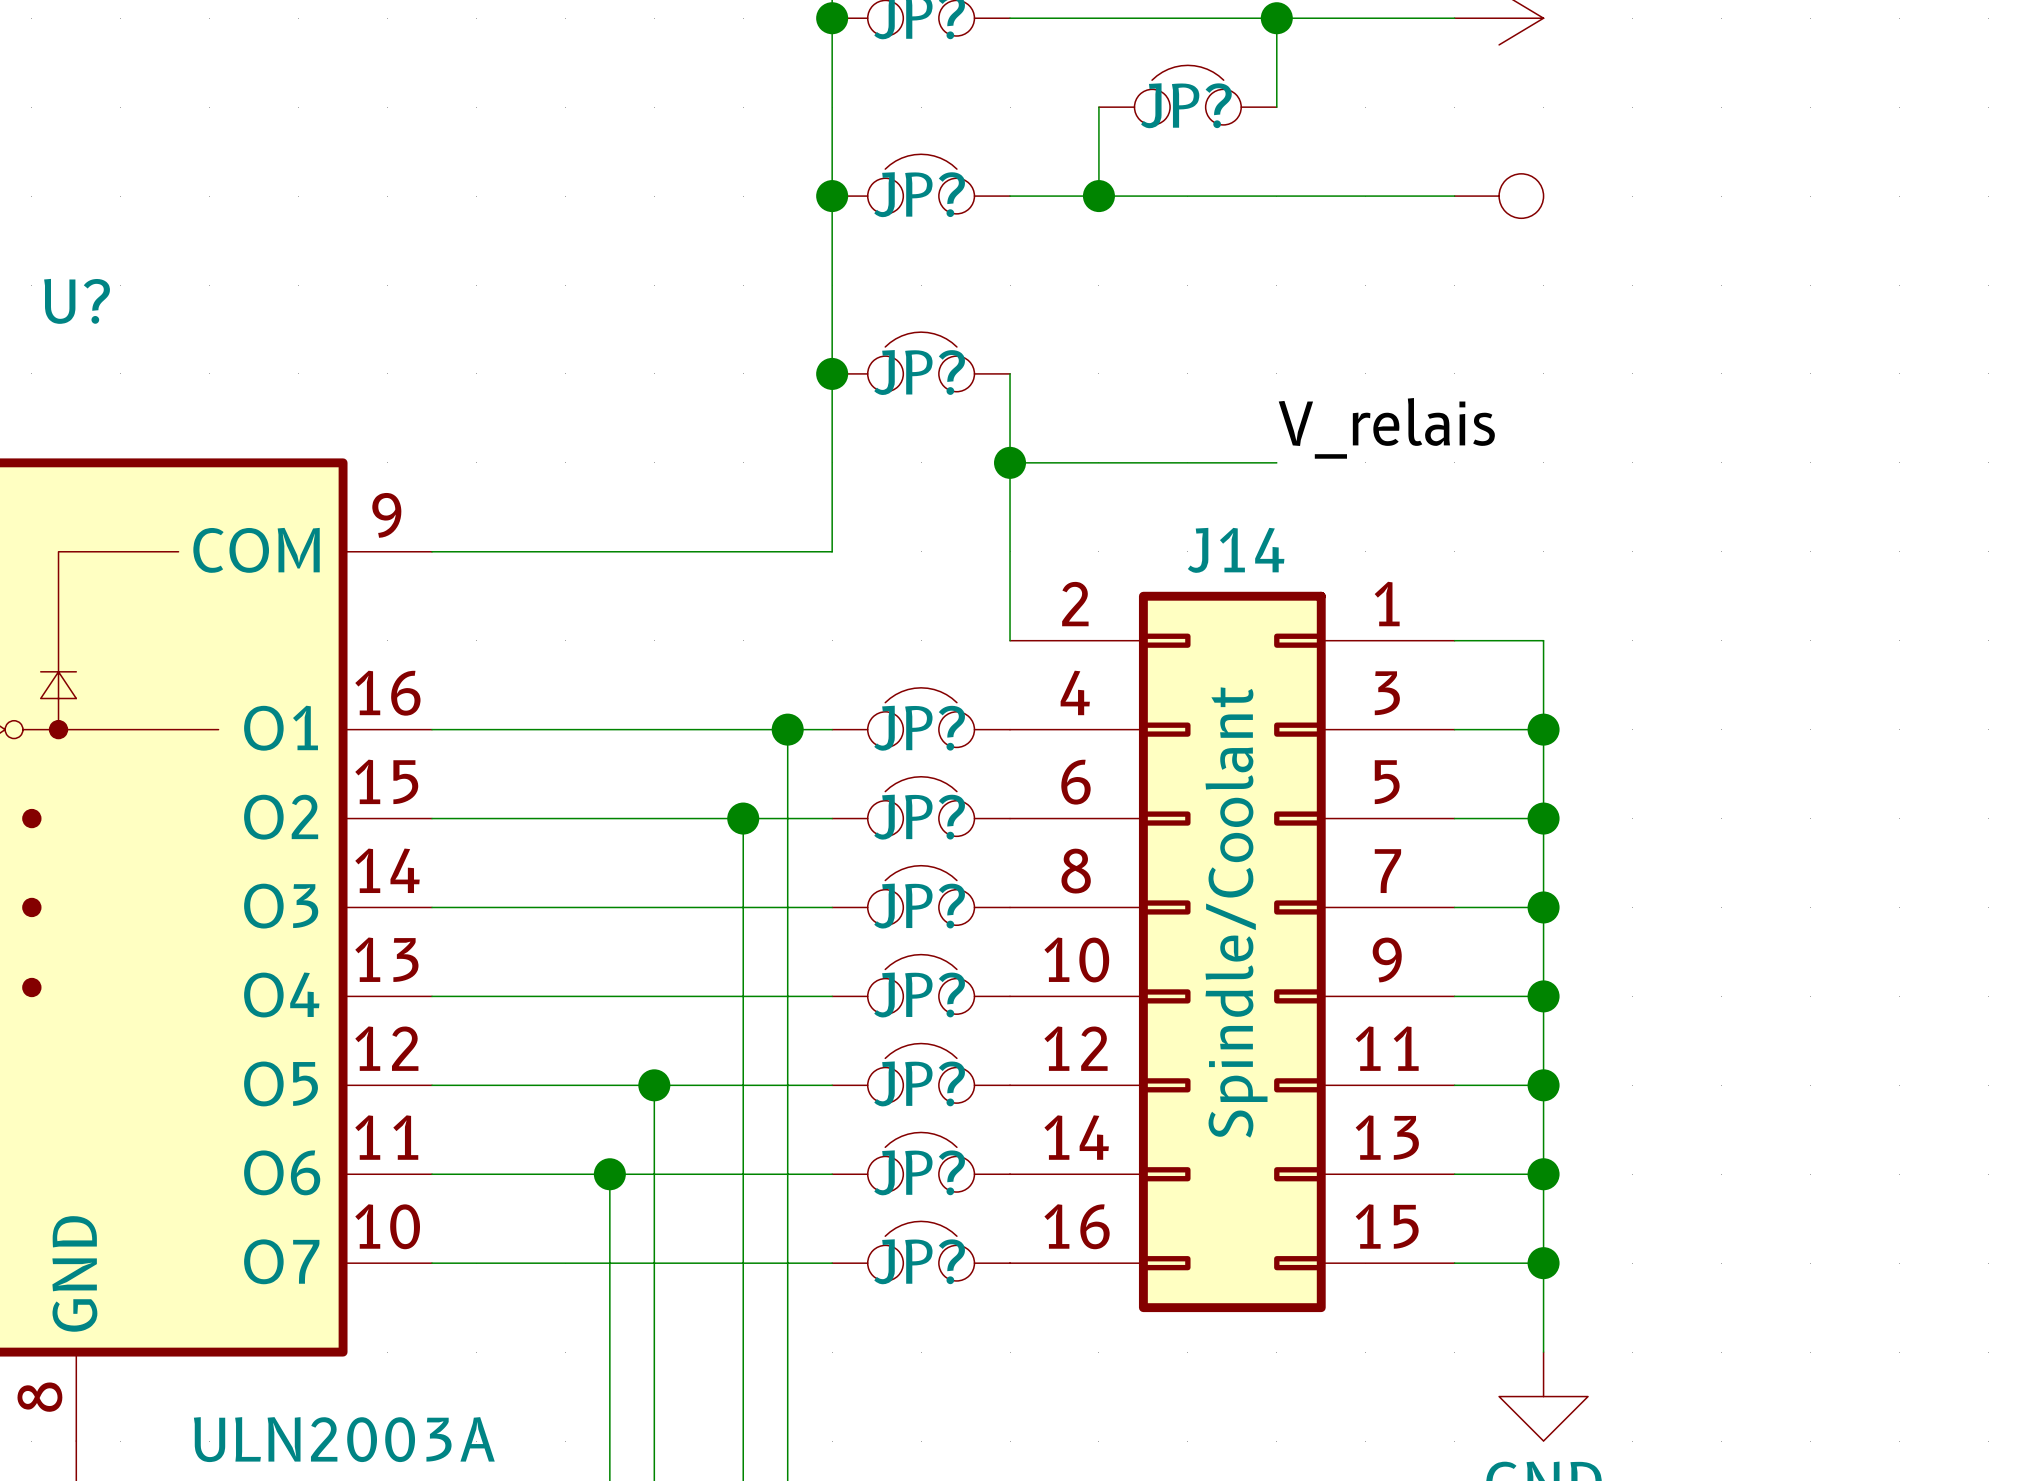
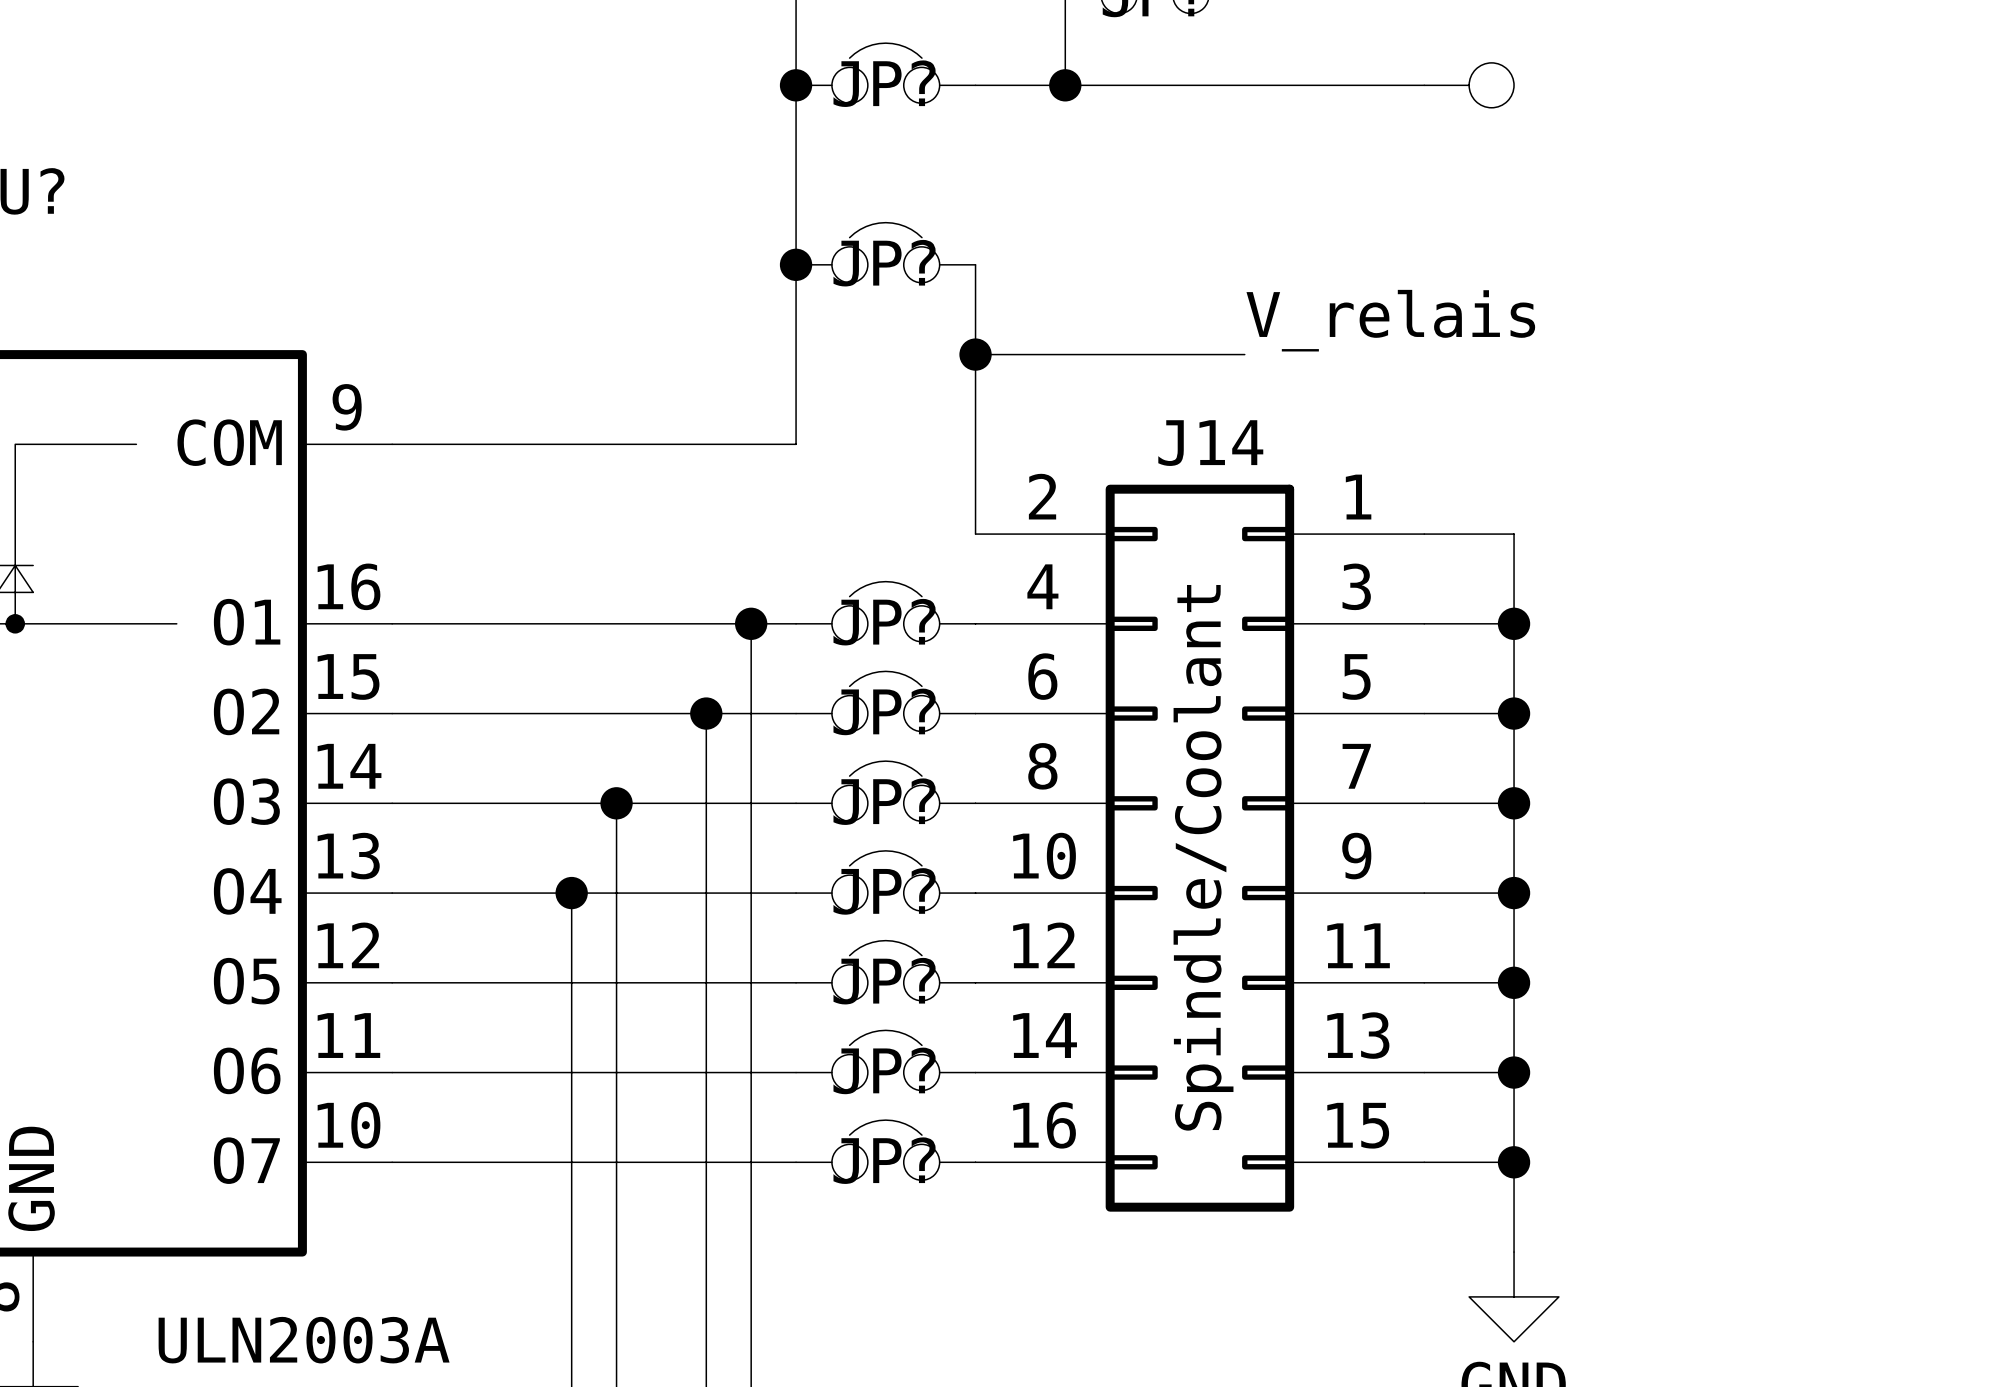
wire: none -> (616, 803) (616, 982)
junction: none -> (616, 803)
wire: none -> (571, 893) (571, 1072)
junction: none -> (571, 893)
junction: (654, 1085) -> none
junction: (609, 1174) -> none

